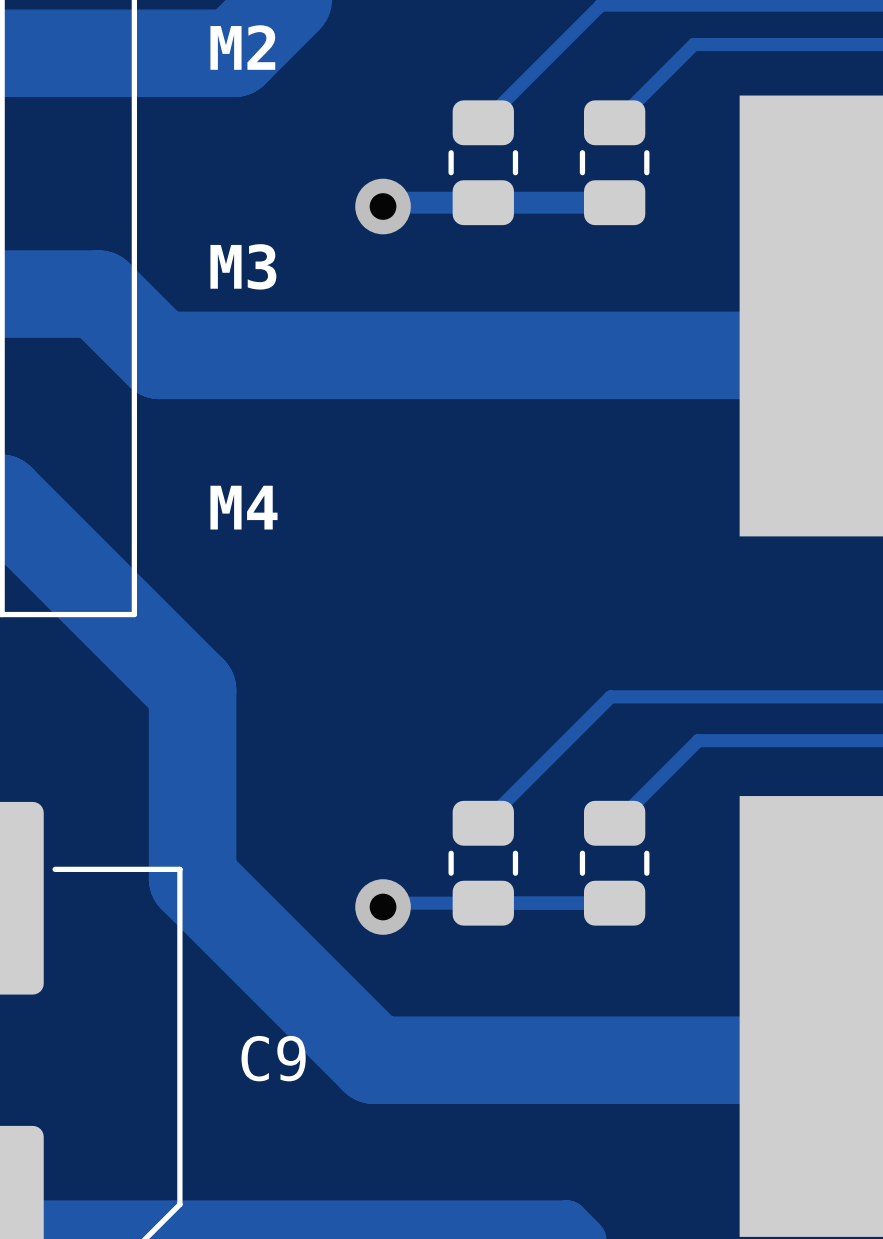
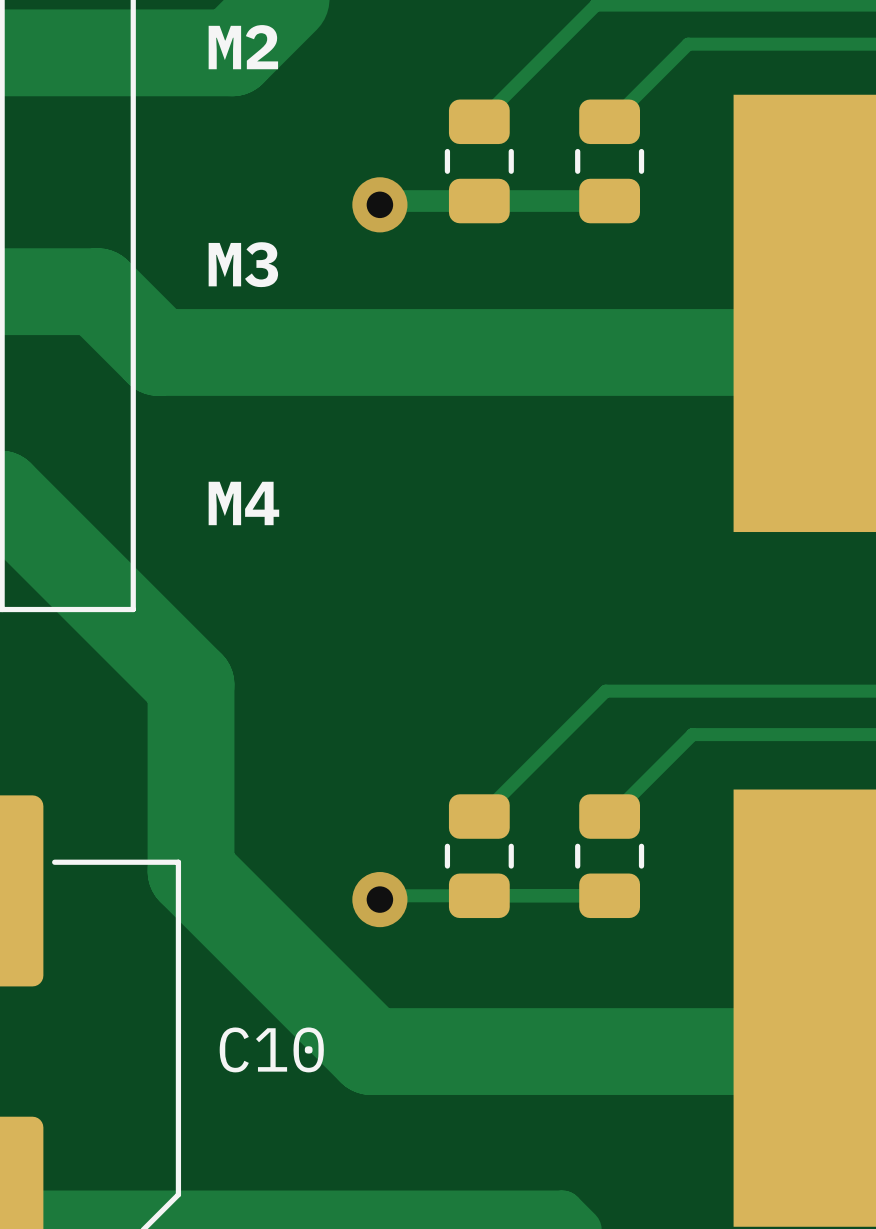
C9 name: C9 (273, 1058) -> C10 (271, 1049)

